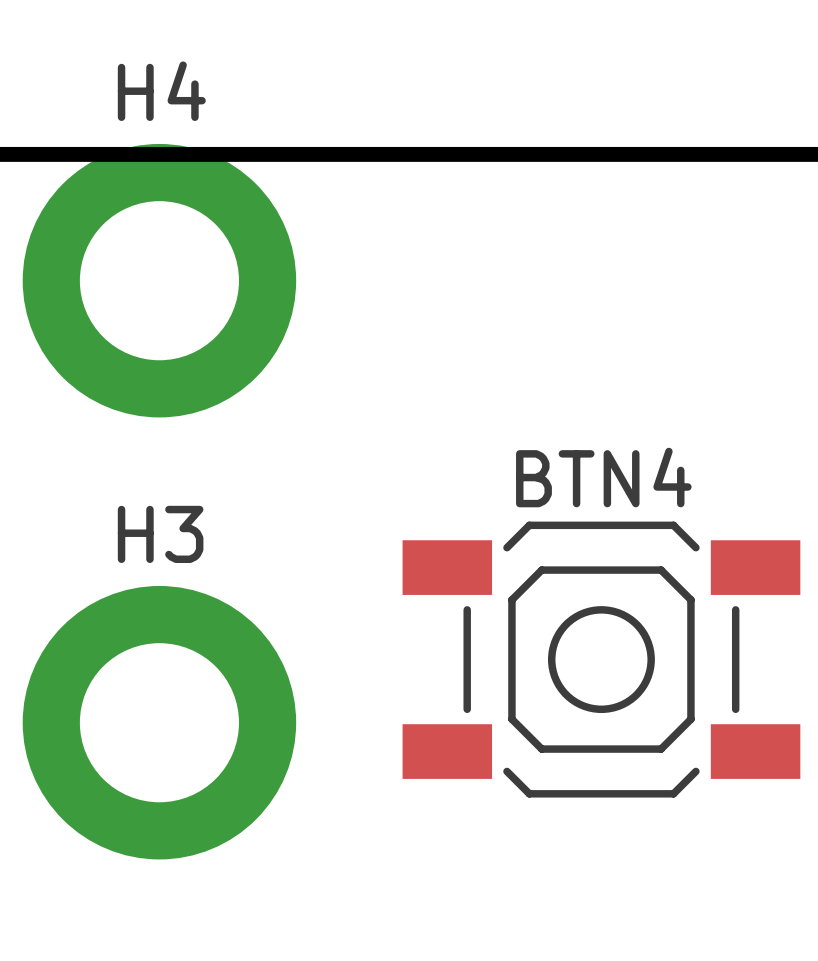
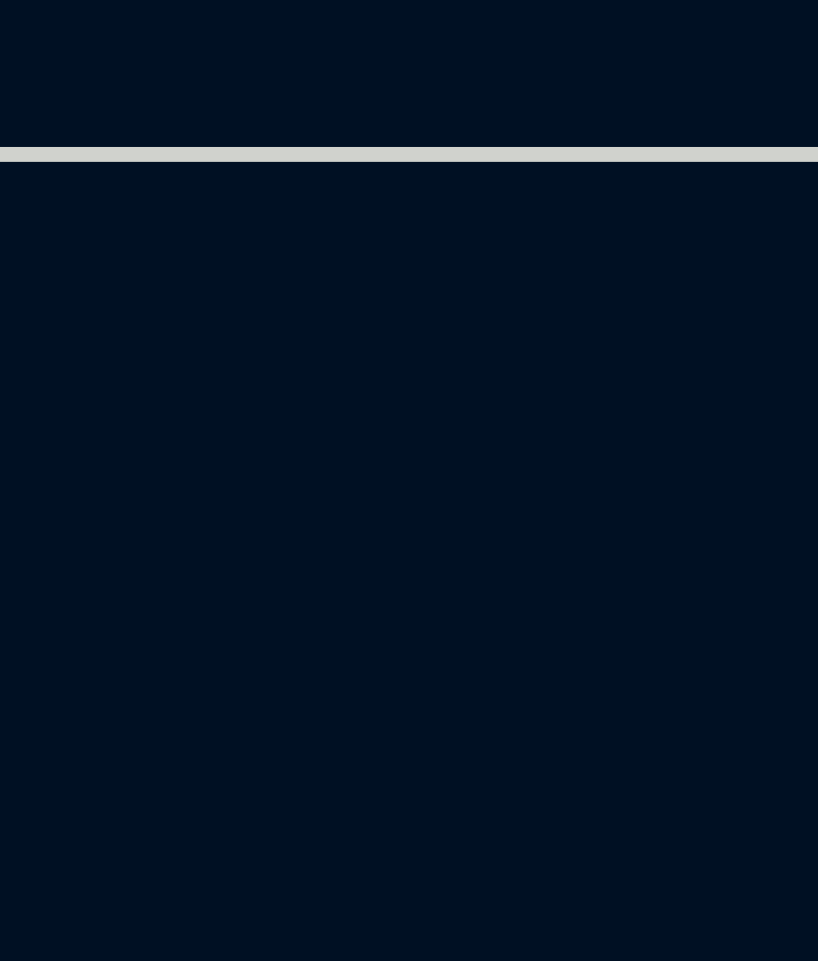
H4: (159, 280) -> none
BTN4: (601, 659) -> none
H3: (159, 722) -> none

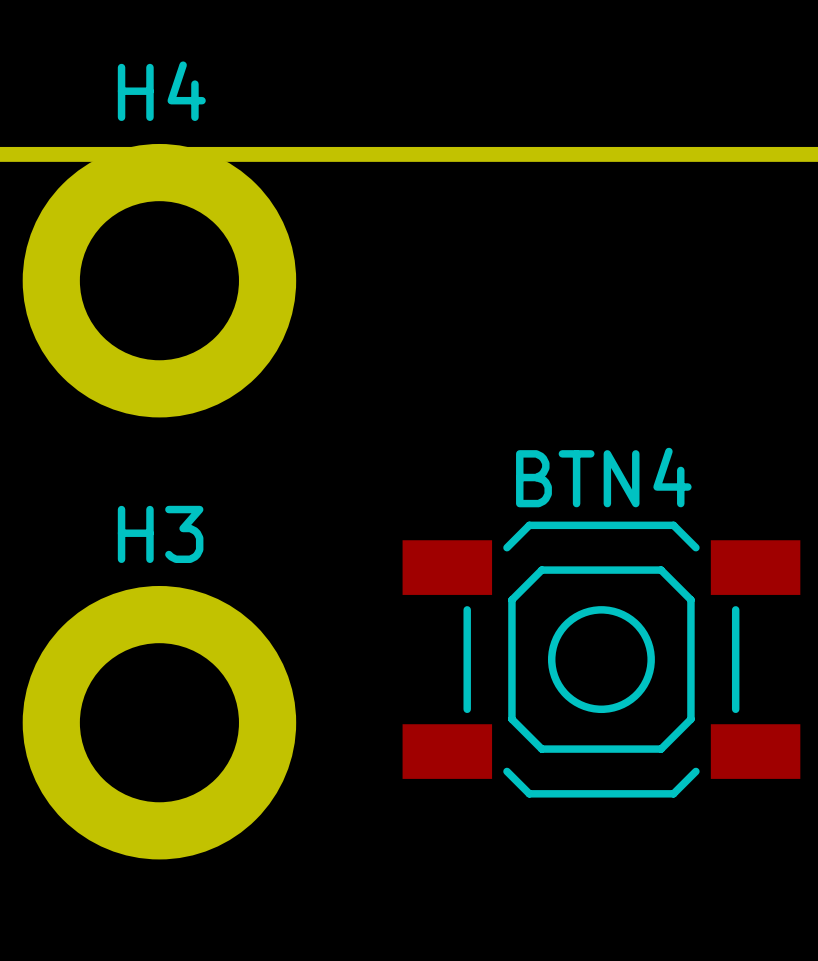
H4: none -> (159, 280)
BTN4: none -> (601, 659)
H3: none -> (159, 722)

